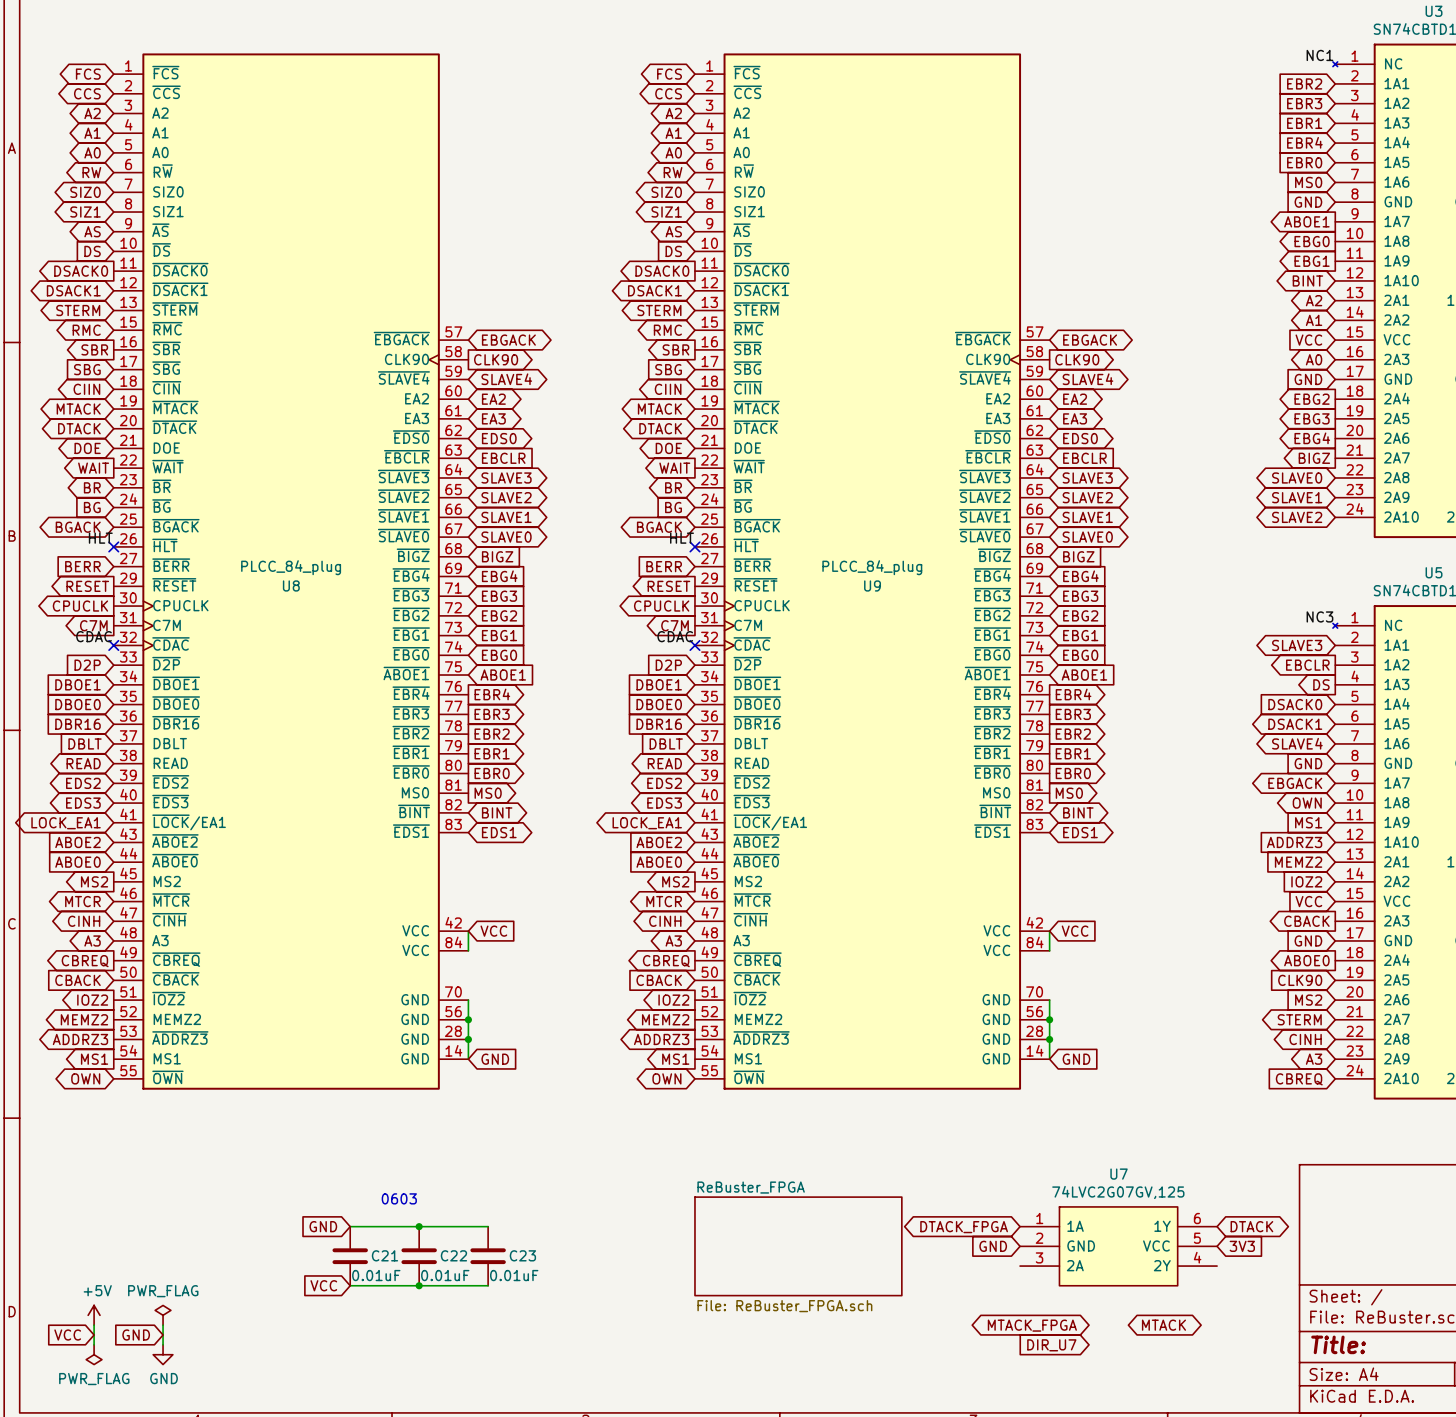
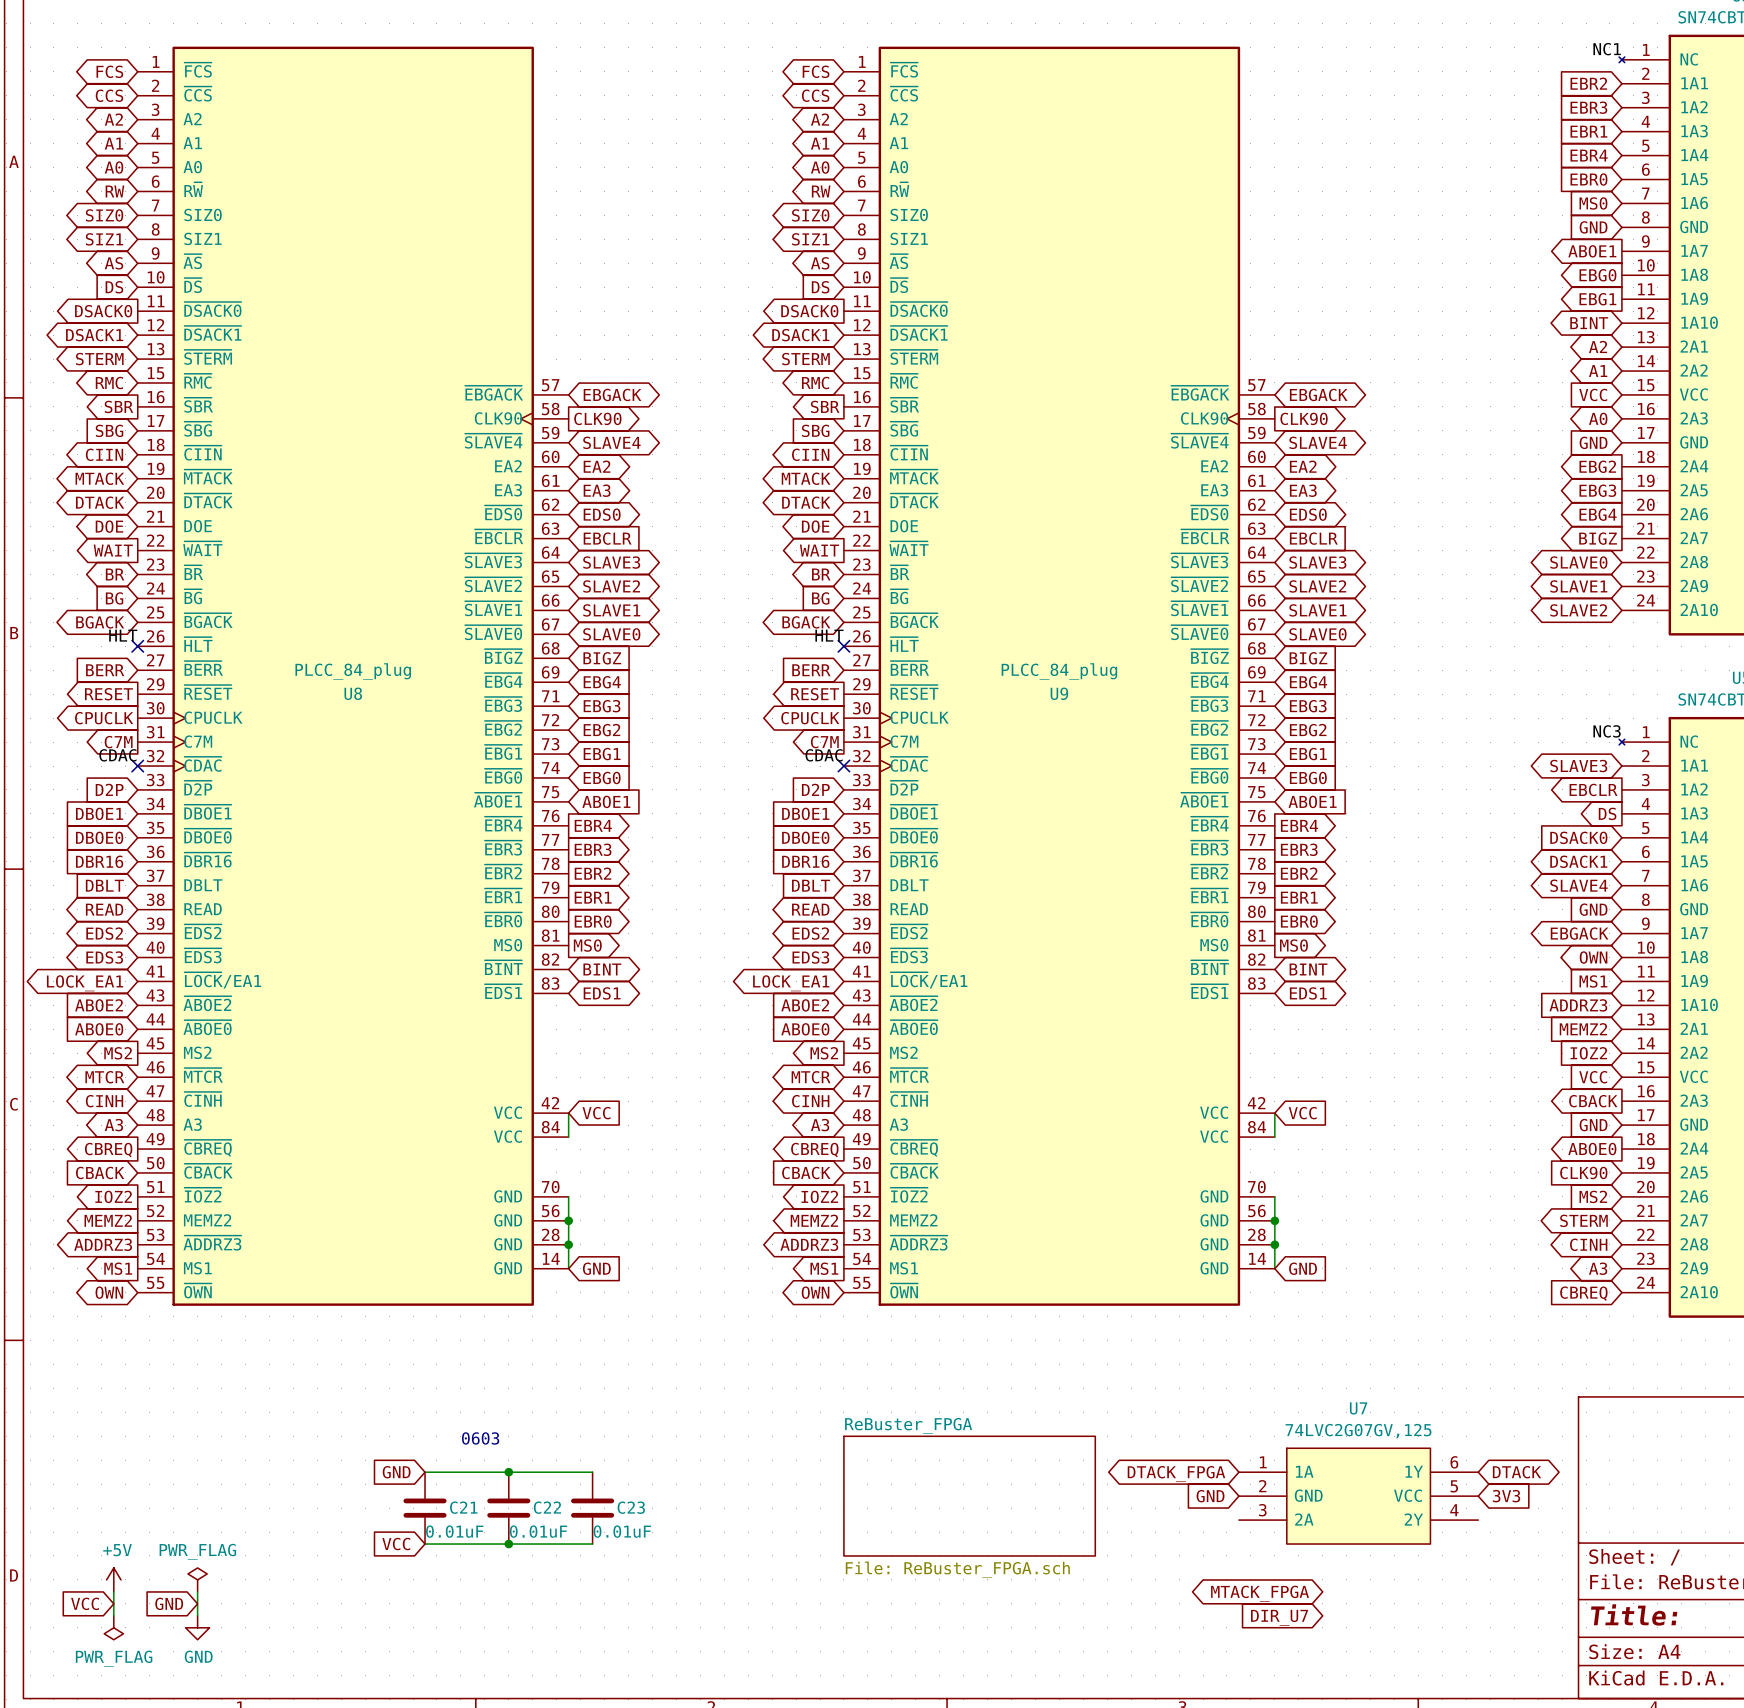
global label: MTACK (1163, 1325) -> none

